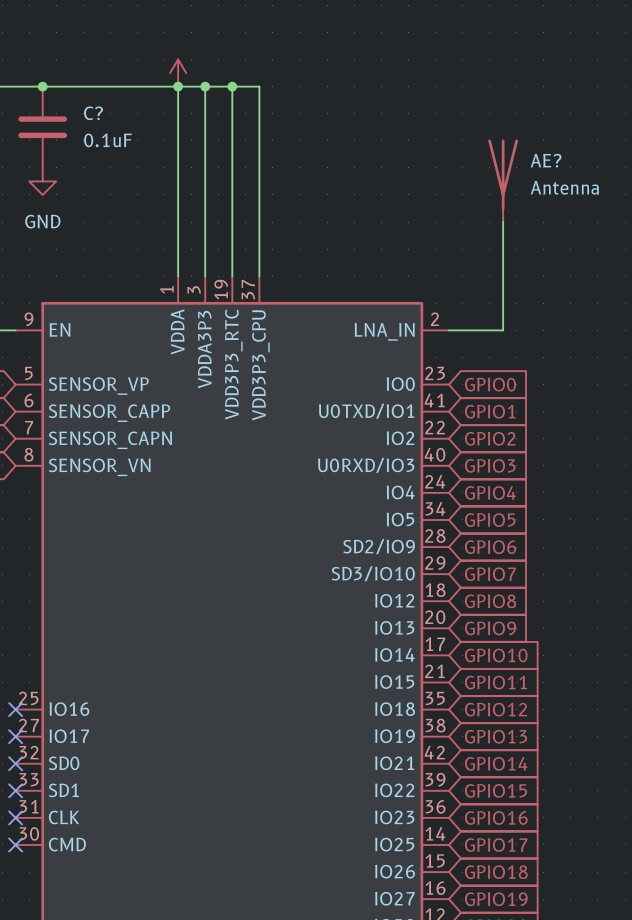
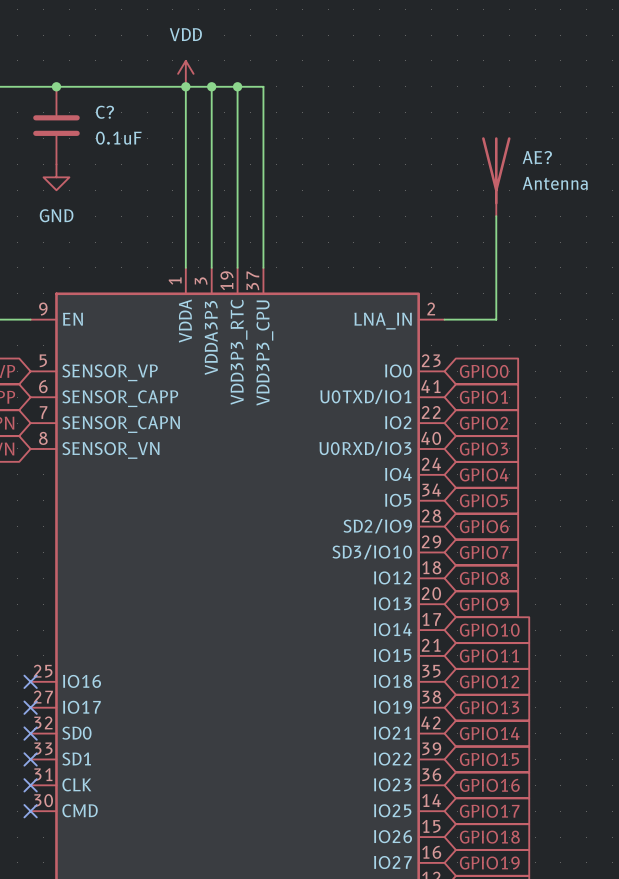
power symbol text: none -> VDD (185, 34)

